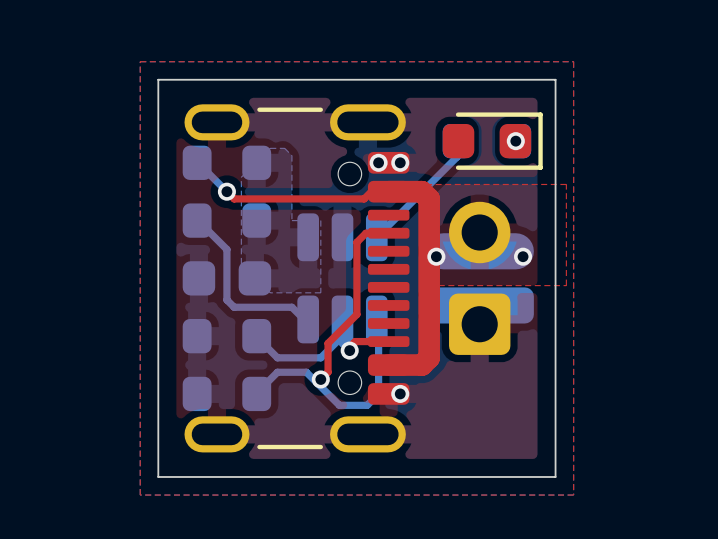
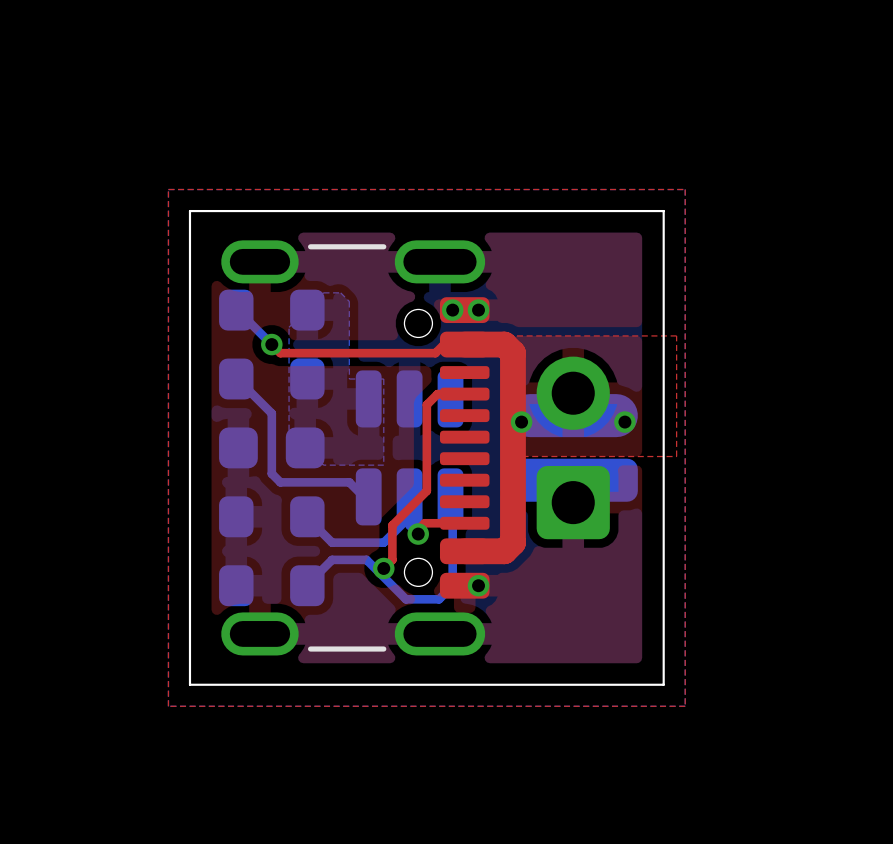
bottom track: (457, 133) (457, 156) (376, 237) -> none
part: (492, 141) -> none
via: (515, 141) -> none

